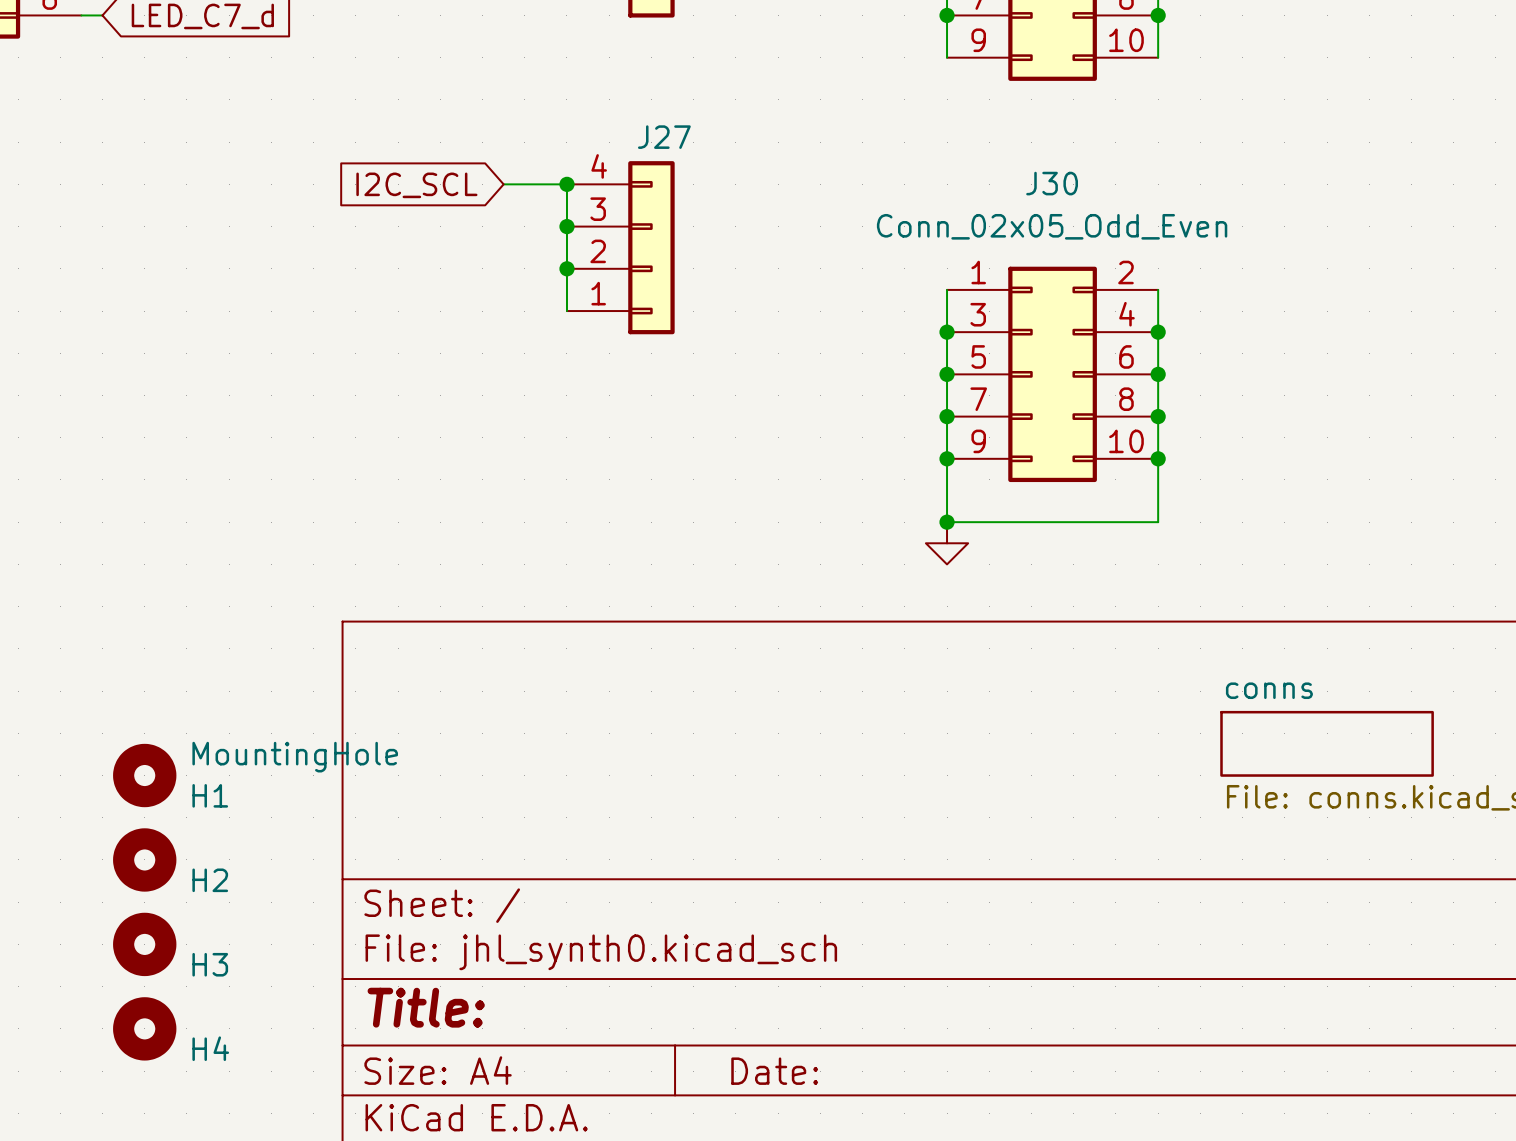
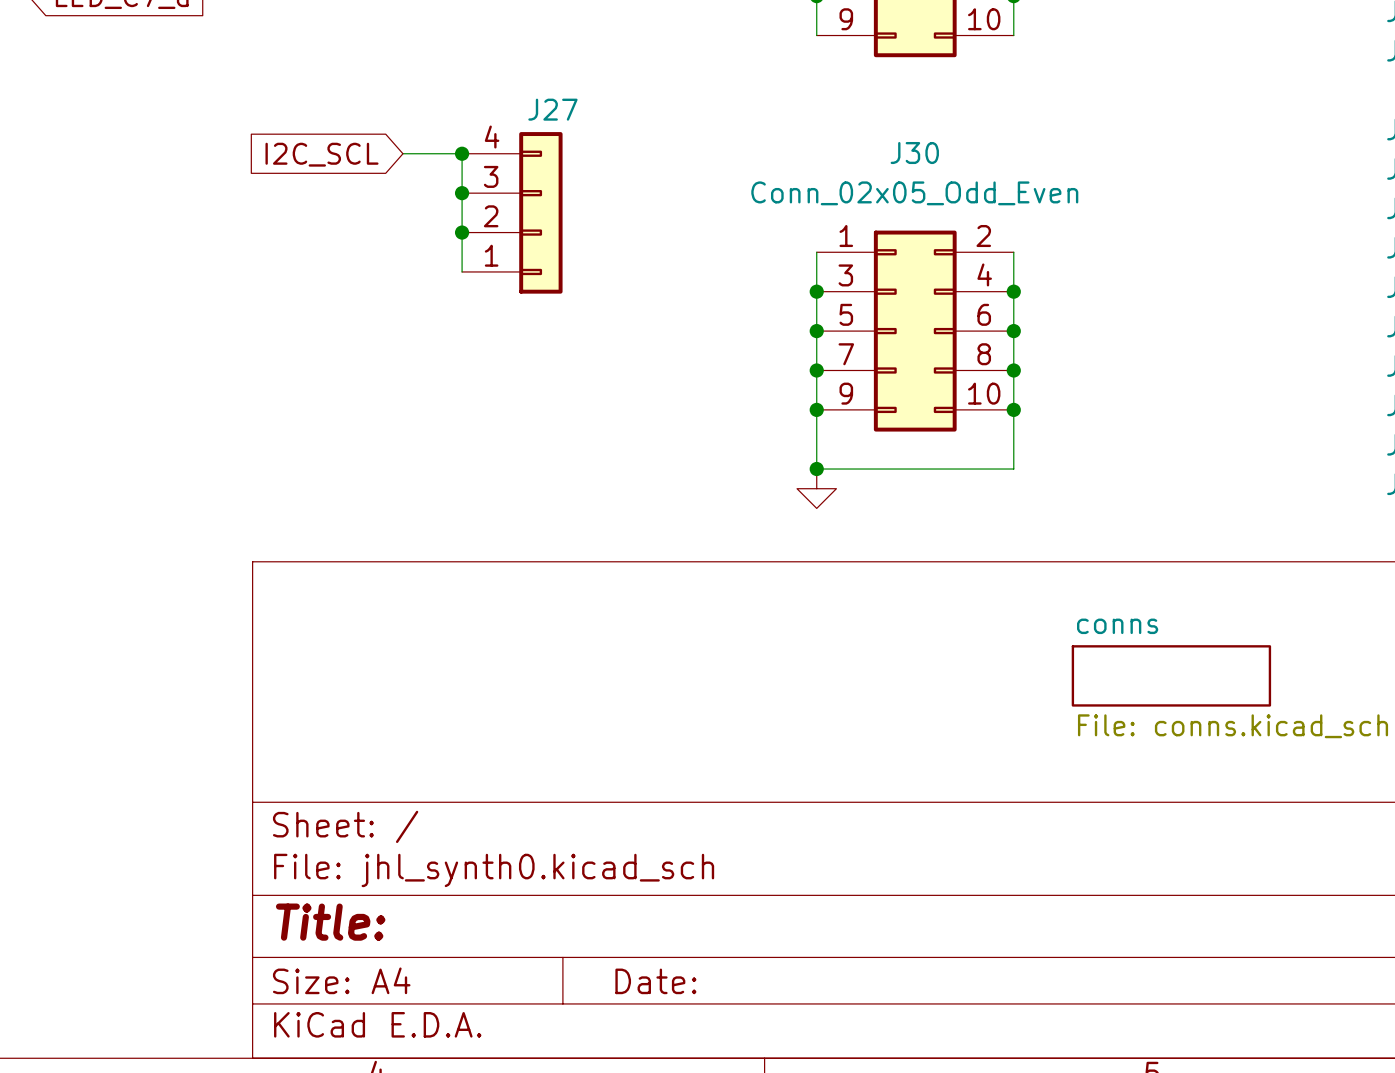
H1: MountingHole (144, 775) -> none
H2: (144, 859) -> none
H3: (144, 944) -> none
H4: (144, 1028) -> none

